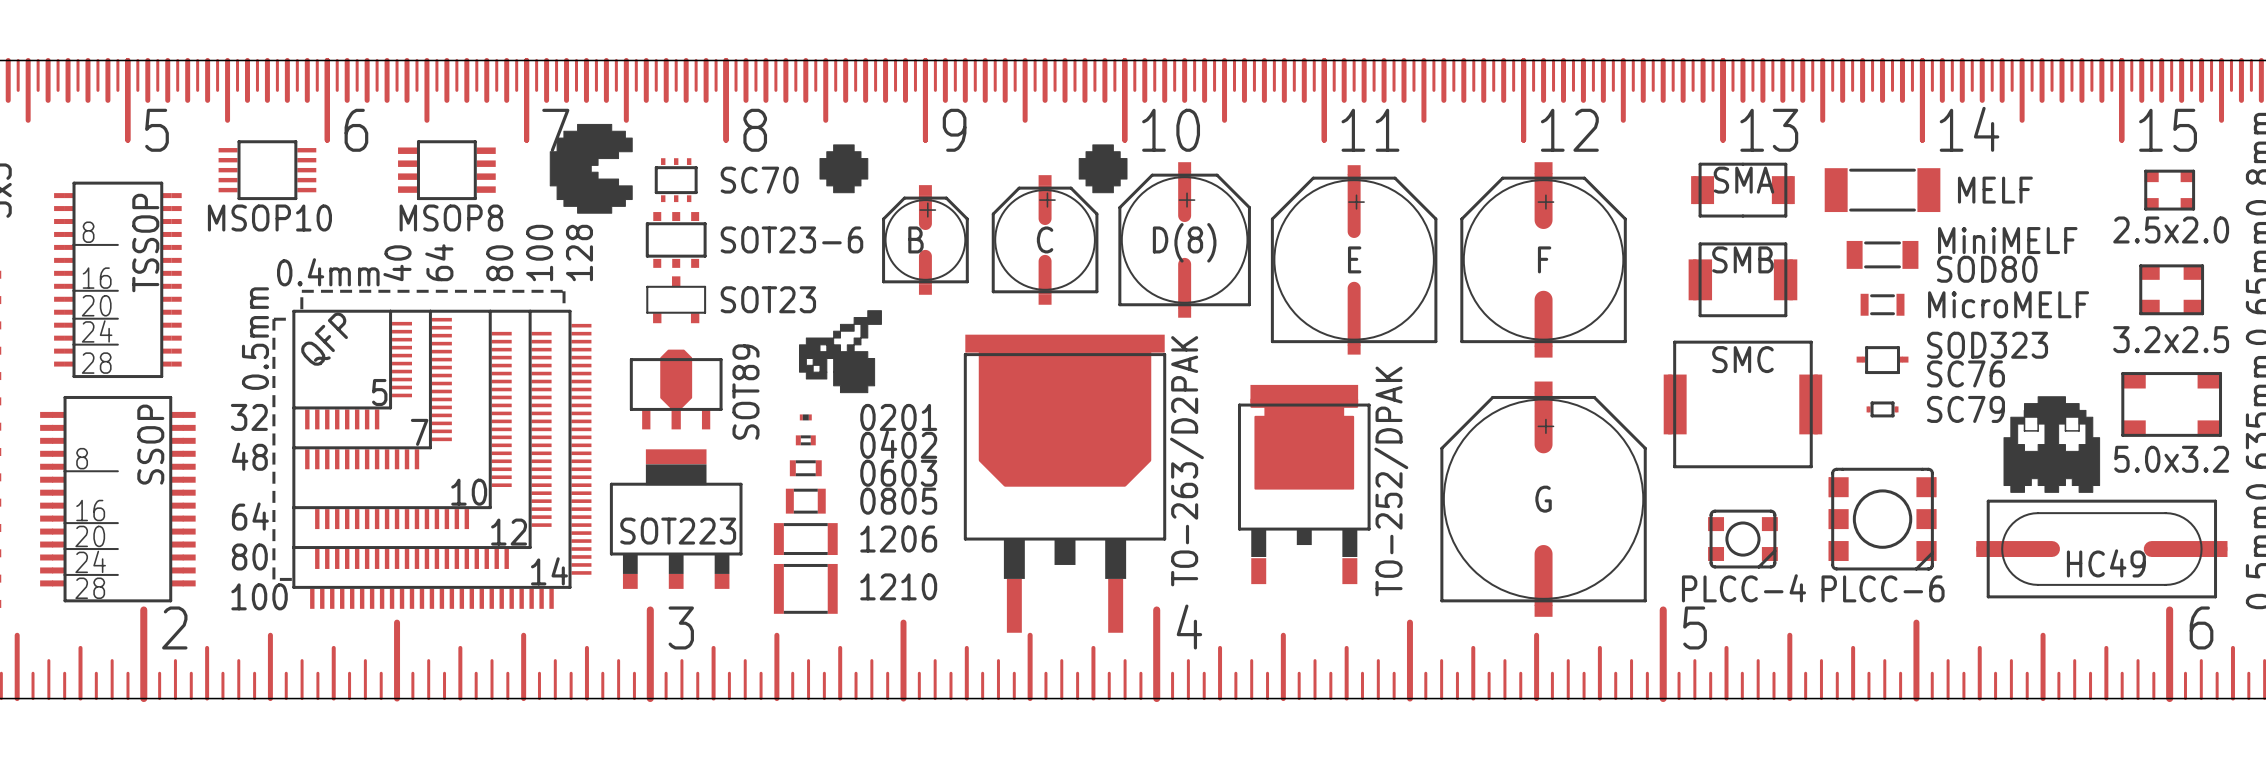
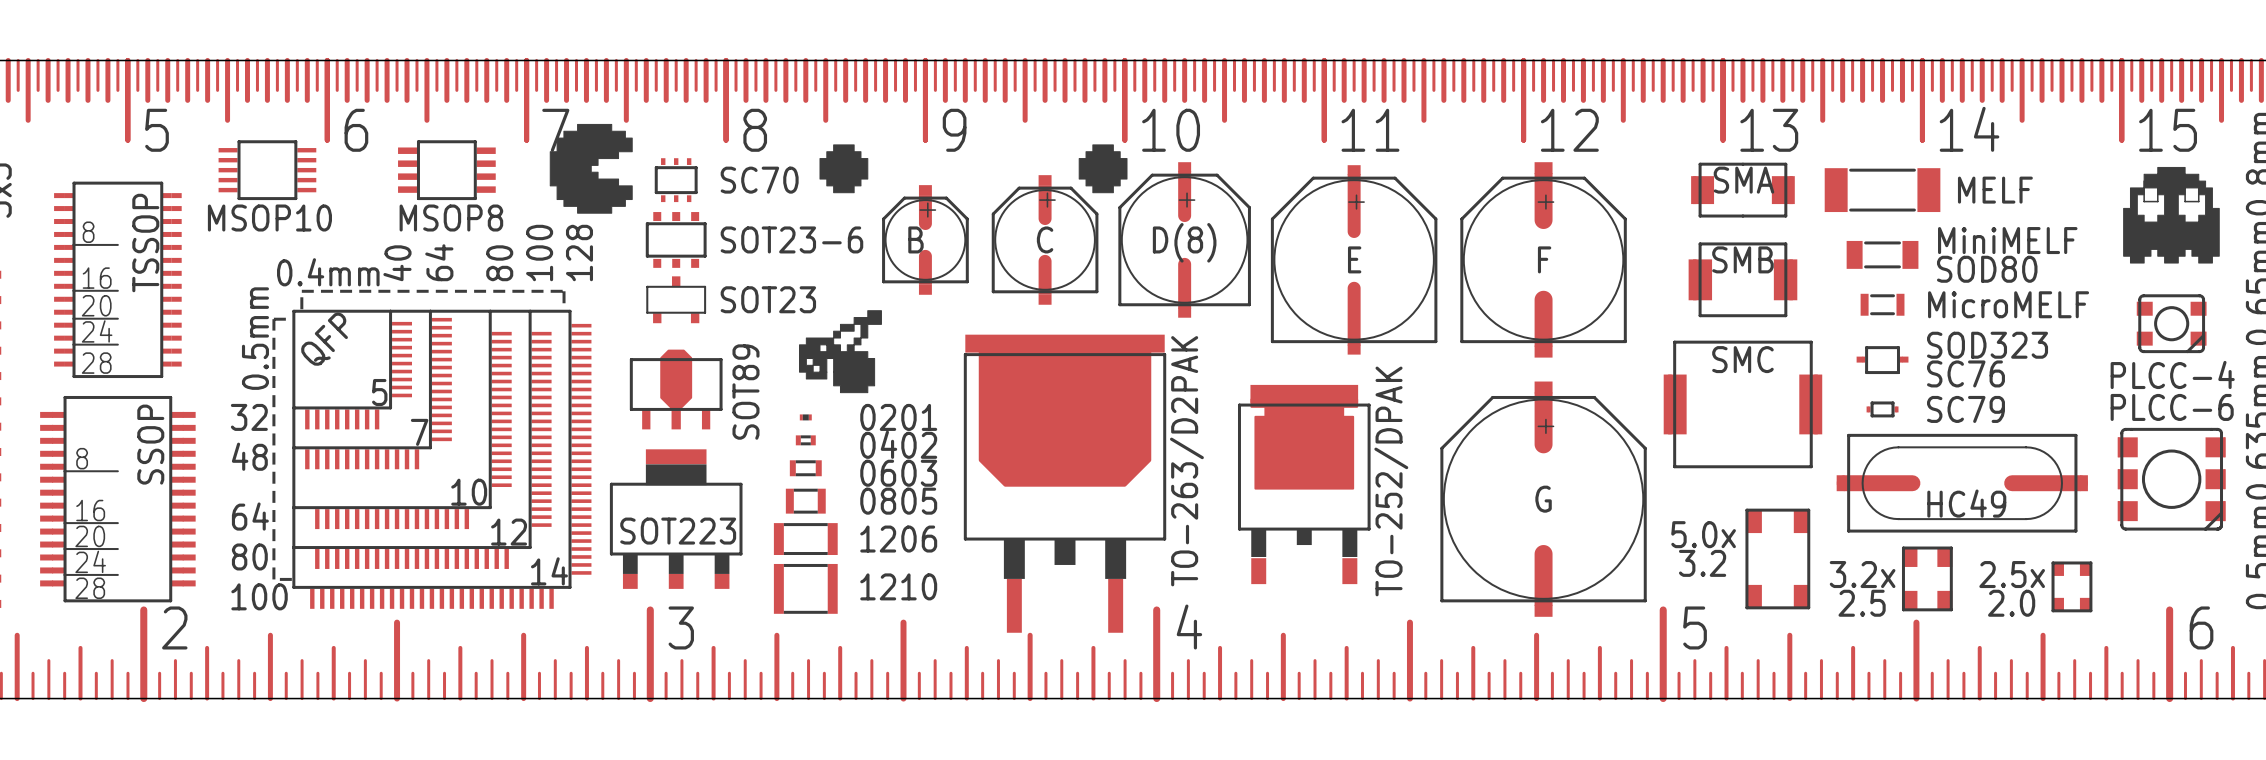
drawing: [2144, 169, 2196, 211] -> none
text: 2.5x2.0 (2171, 229) -> none
drawing: [2139, 264, 2205, 316] -> none
text: 3.2x2.5 (2171, 339) -> none
drawing: [2121, 372, 2223, 437] -> none
drawing position: (2051, 444) -> (2171, 215)
text: 5.0x3.2 (2171, 459) -> none
drawing: none -> [1745, 508, 1811, 610]
part position: (1882, 519) -> (2171, 479)
text: none -> 5.0x (1703, 534)
part position: (1742, 539) -> (2171, 323)
drawing: none -> [1901, 546, 1953, 612]
part position: (2101, 549) -> (1962, 483)
drawing: none -> [2051, 561, 2093, 613]
text: none -> 3.2 (1702, 563)
text position: HC49 (2106, 563) -> HC49 (1966, 503)
text: none -> 3.2x (1862, 574)
text: none -> 2.5x (2012, 574)
text position: PLCC-4 (1743, 588) -> PLCC-4 (2172, 374)
text position: PLCC-6 (1883, 588) -> PLCC-6 (2172, 407)
text: none -> 2.5 (1862, 603)
text: none -> 2.0 (2011, 603)

